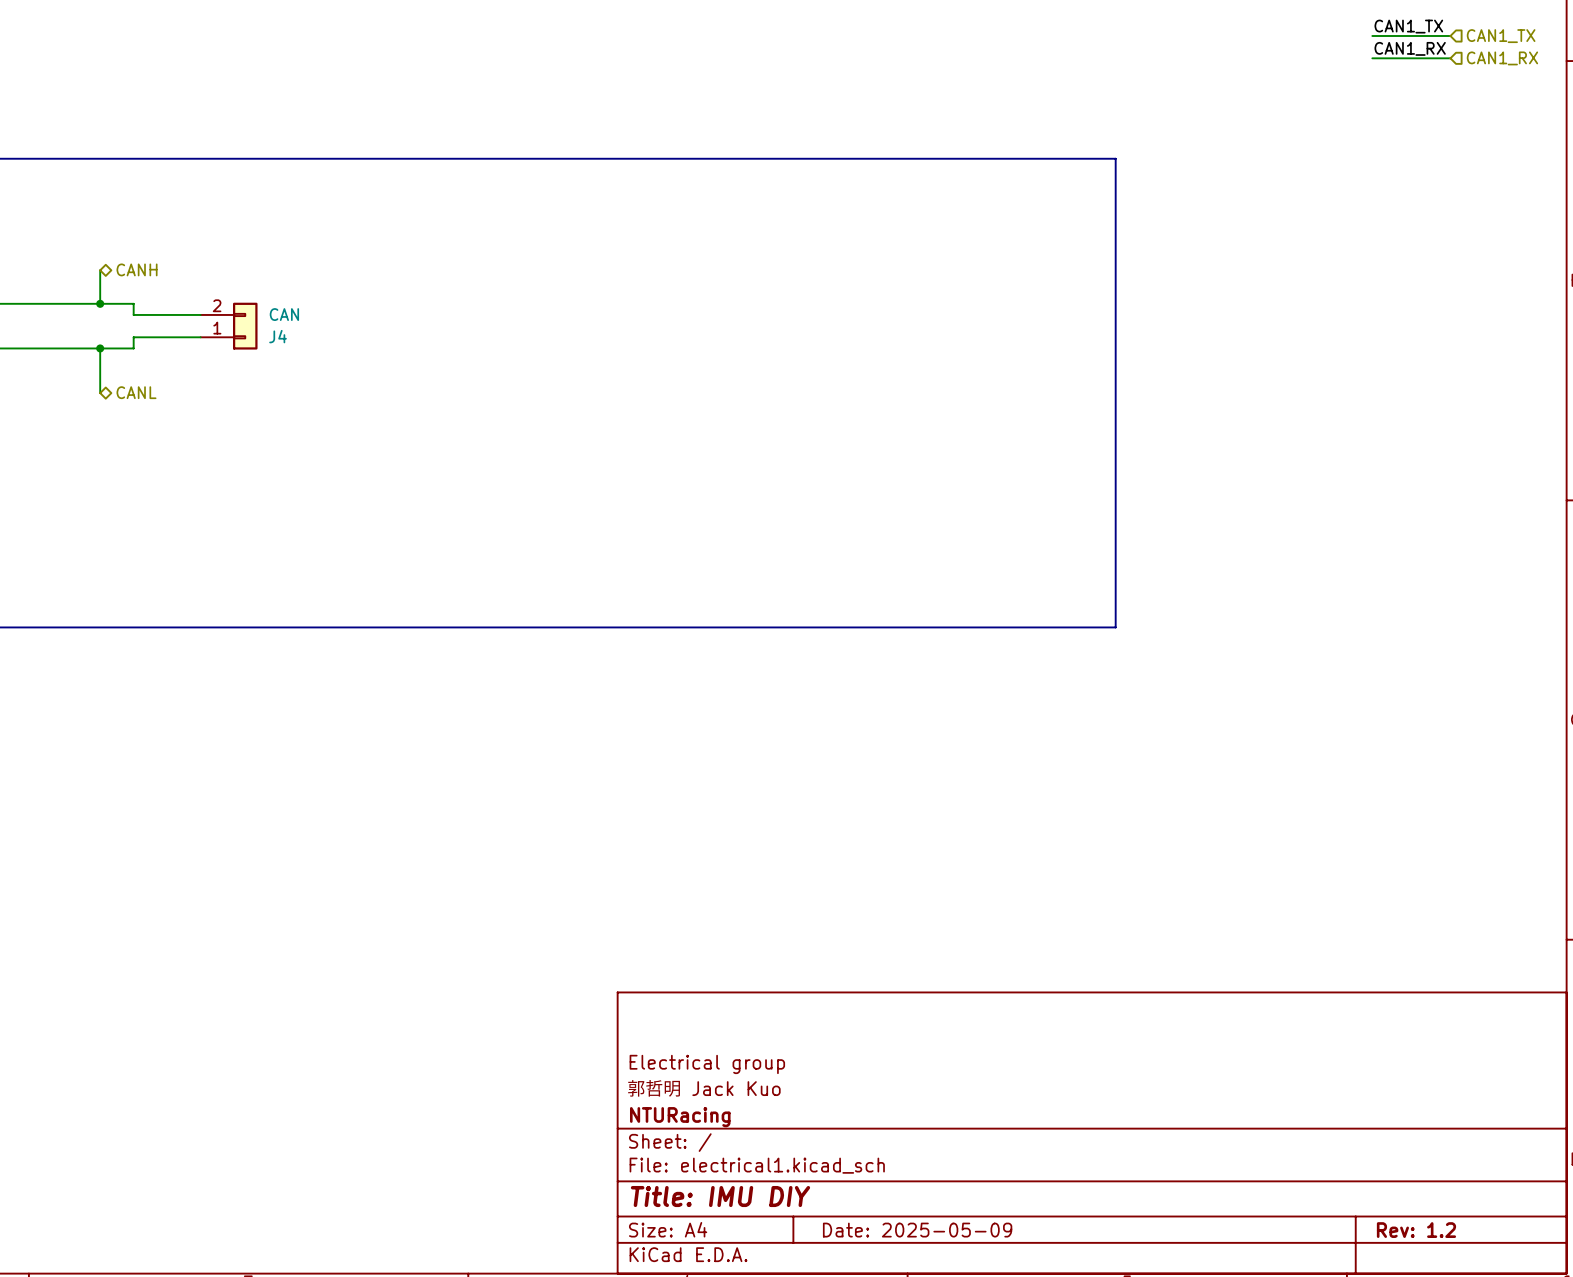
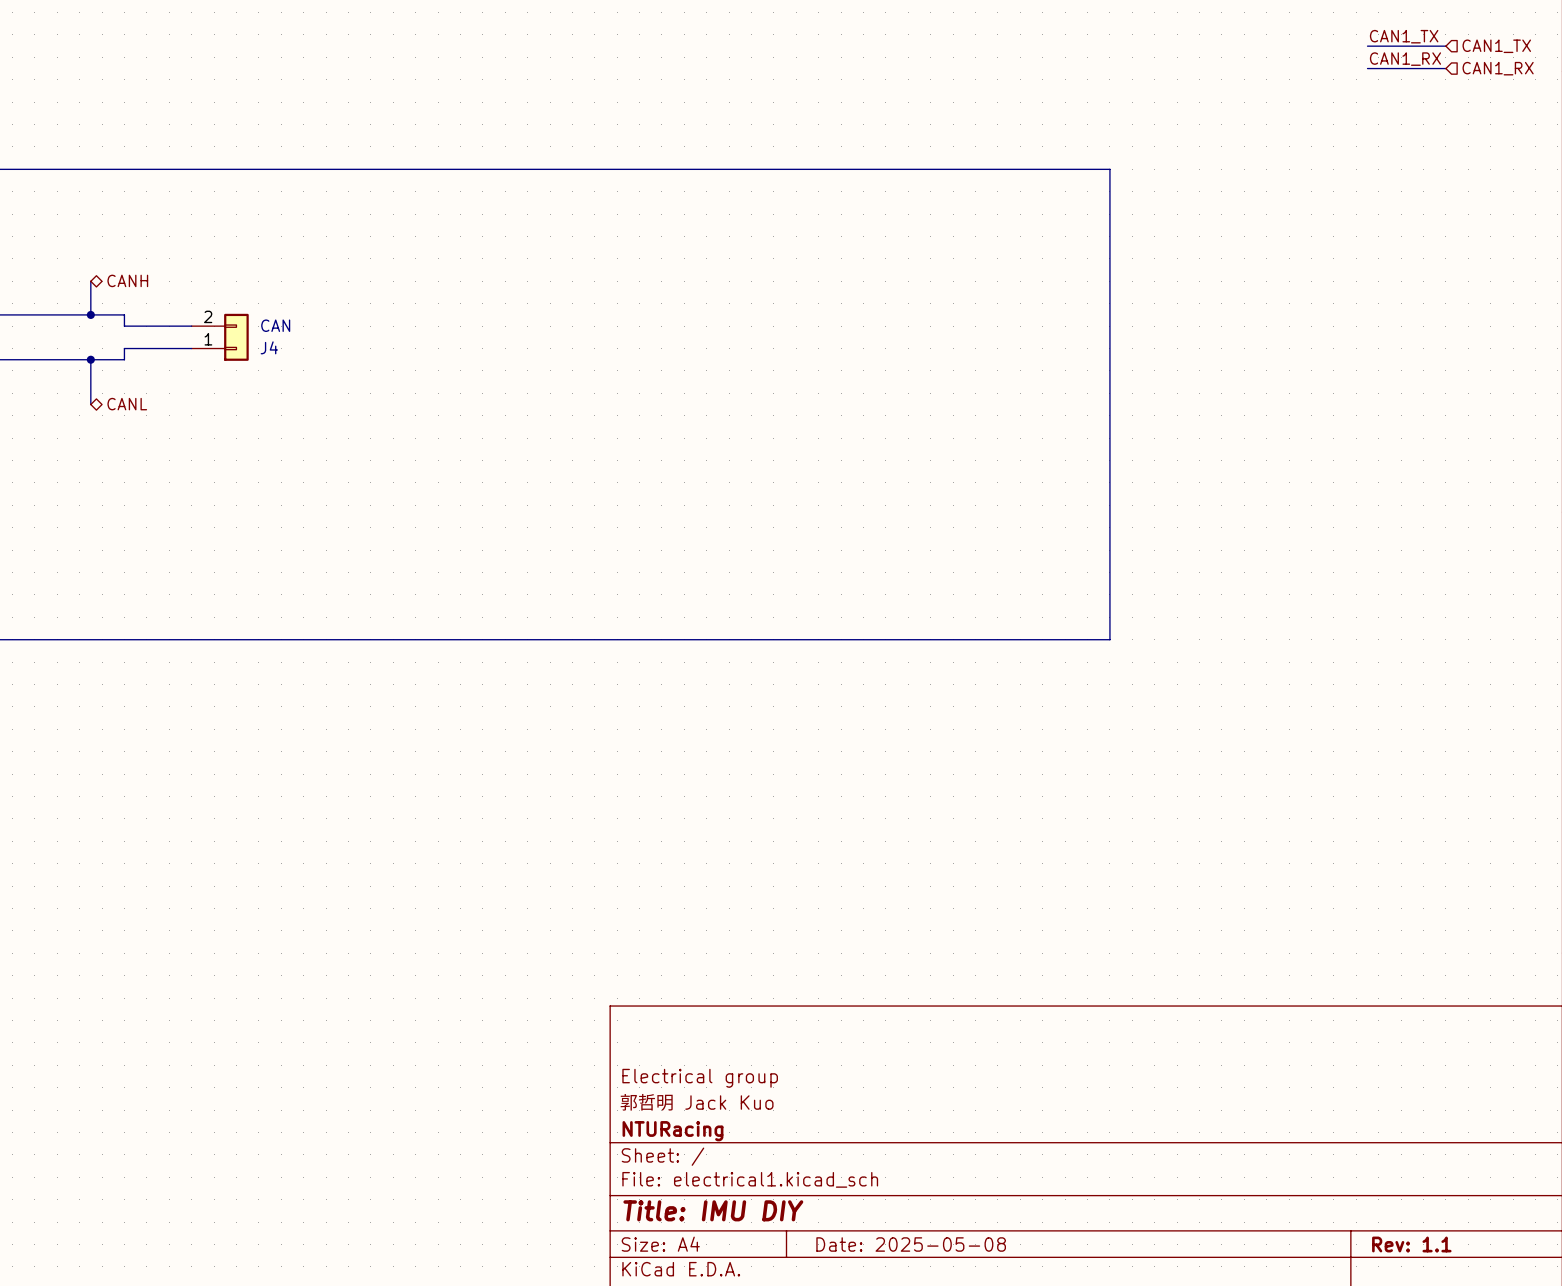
title block: Date: 2025-05-09 (917, 1230) -> Date: 2025-05-08 (911, 1244)
title block: Rev: 1.2 (1416, 1230) -> Rev: 1.1 (1411, 1244)

